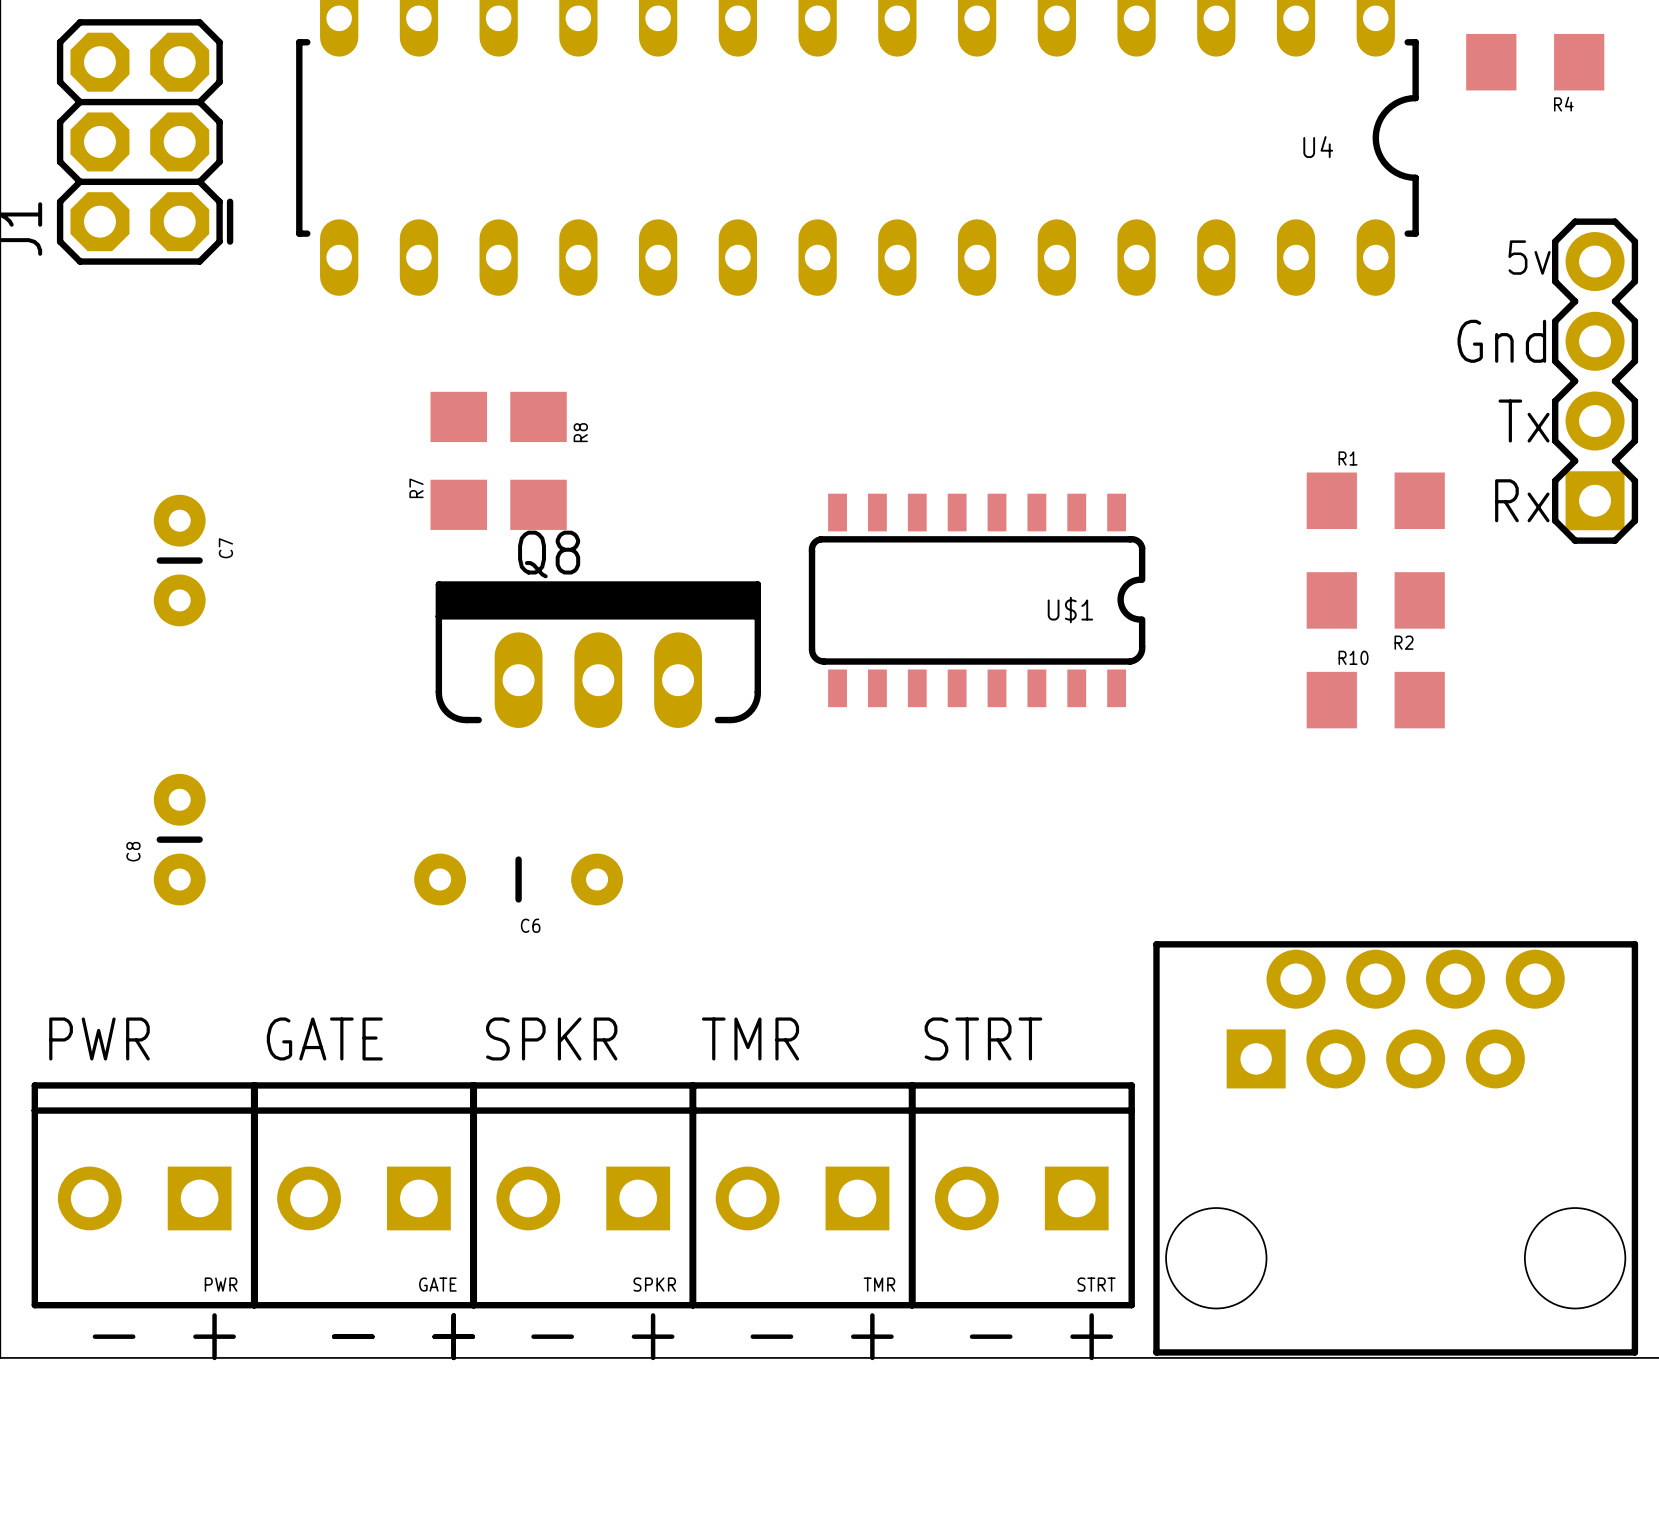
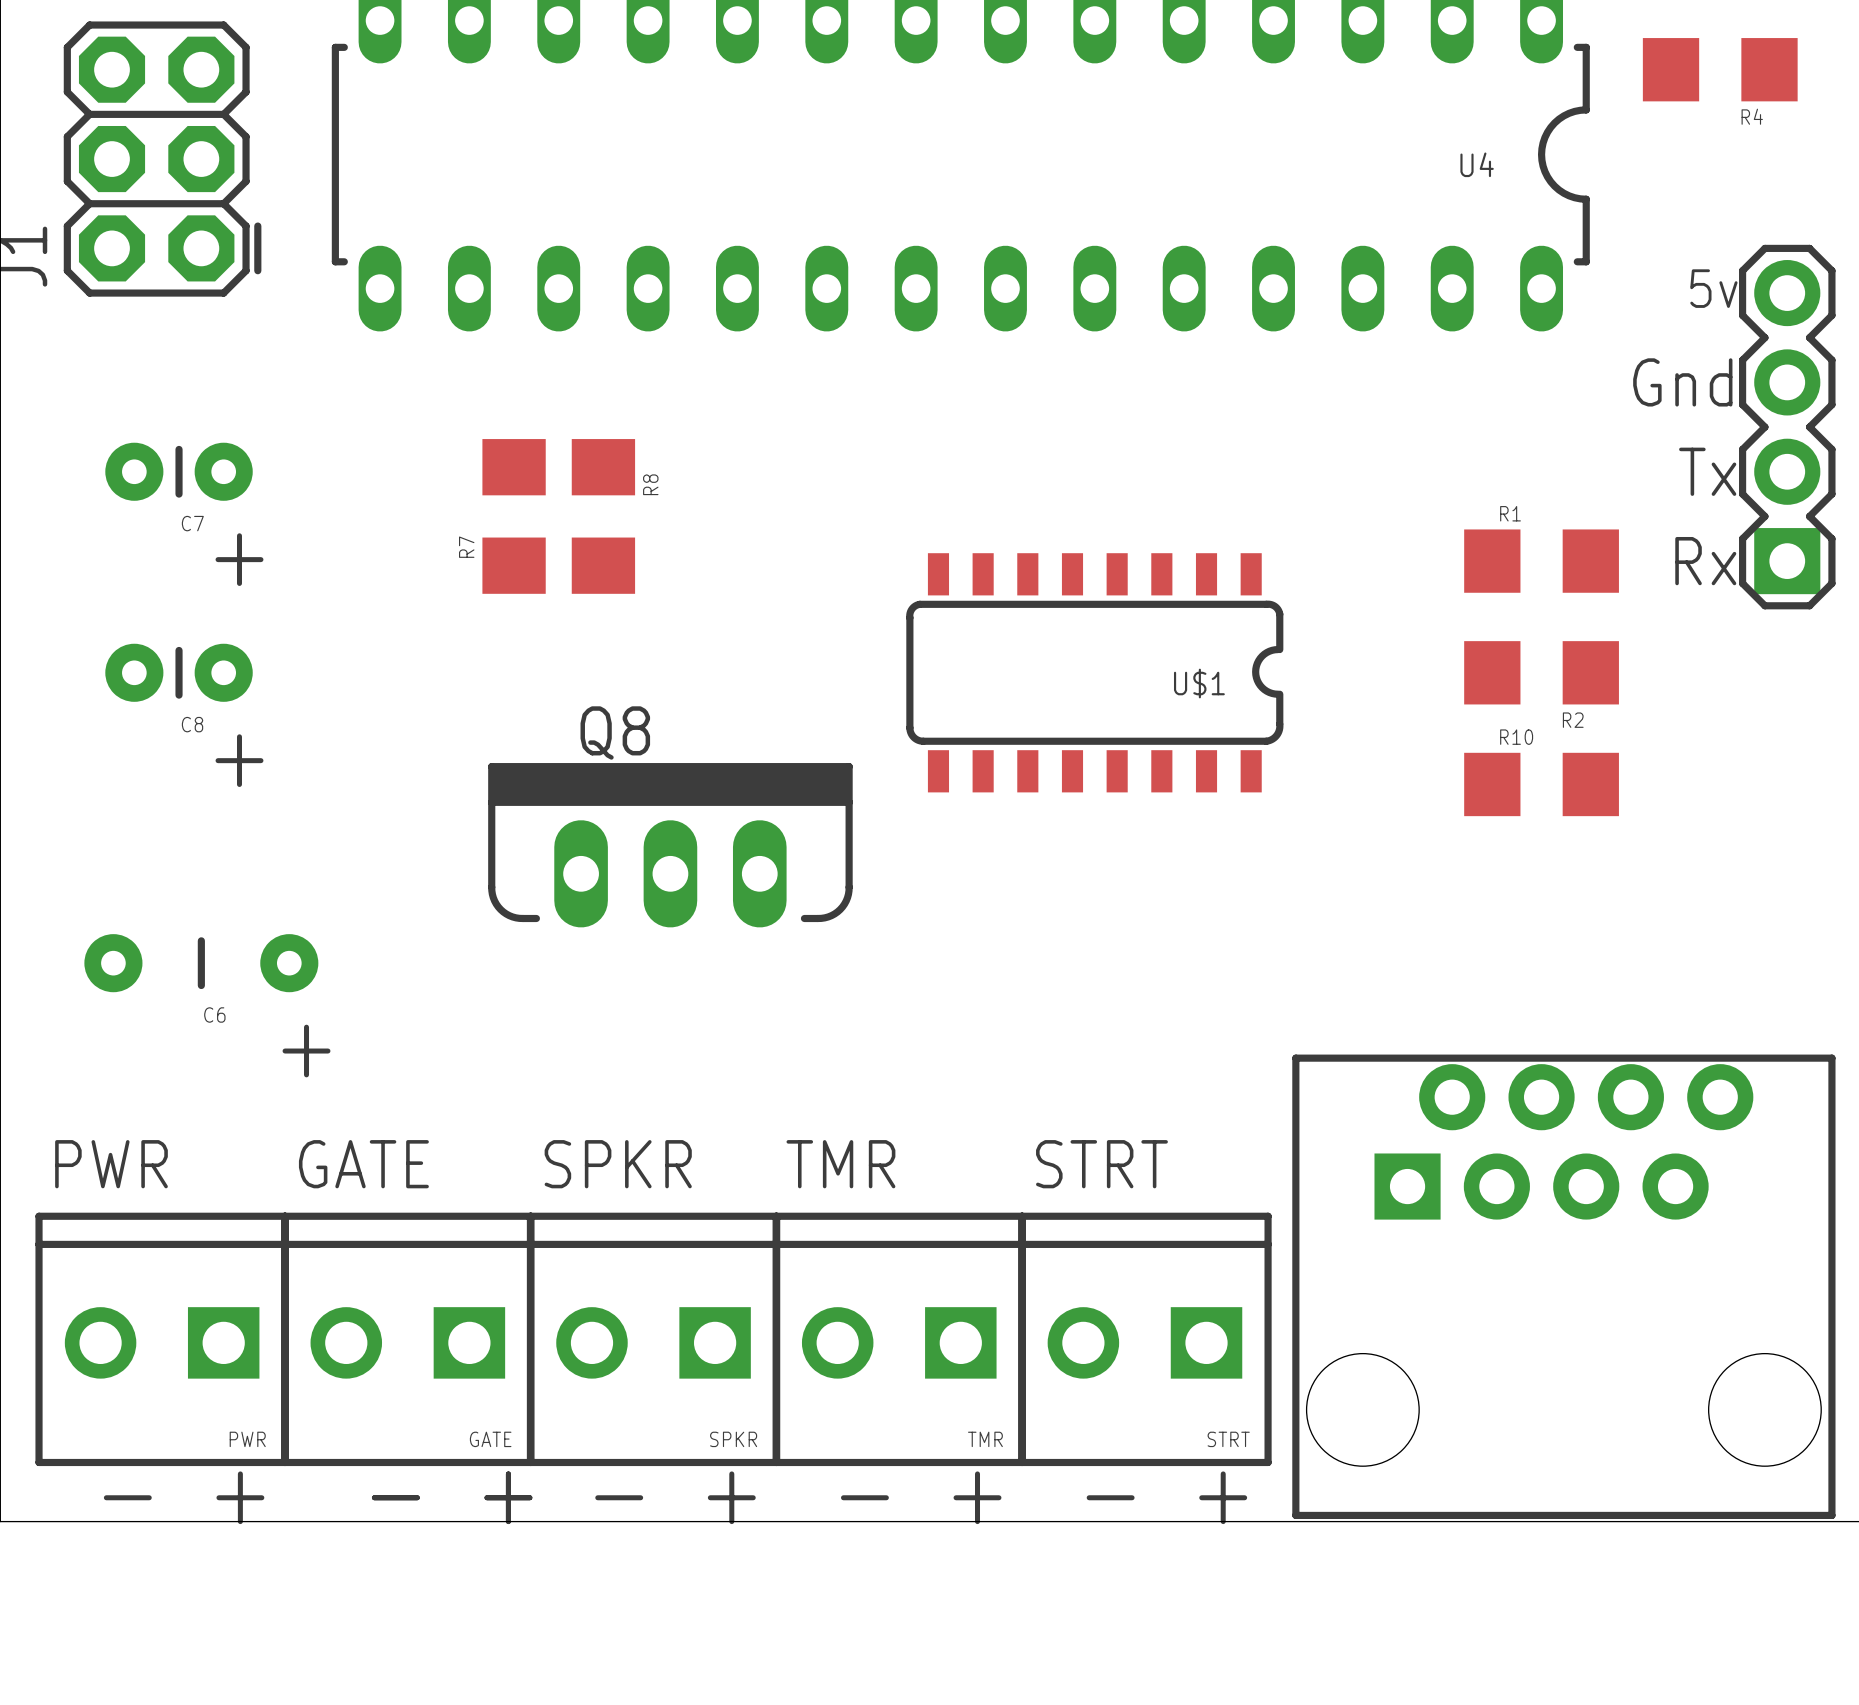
text: none -> + (239, 559)
C7 rotation: 0° (179, 560) -> 90° clockwise (179, 471)
C7 position: (179, 560) -> (179, 471)
Q8 position: (598, 654) -> (670, 845)
text: none -> + (239, 760)
C8 rotation: 0° (179, 839) -> 90° clockwise (179, 672)
C8 position: (179, 839) -> (179, 672)
C8 name position: C8 (133, 851) -> C8 (192, 724)
C6 position: (518, 879) -> (201, 963)
text: none -> + (306, 1051)

